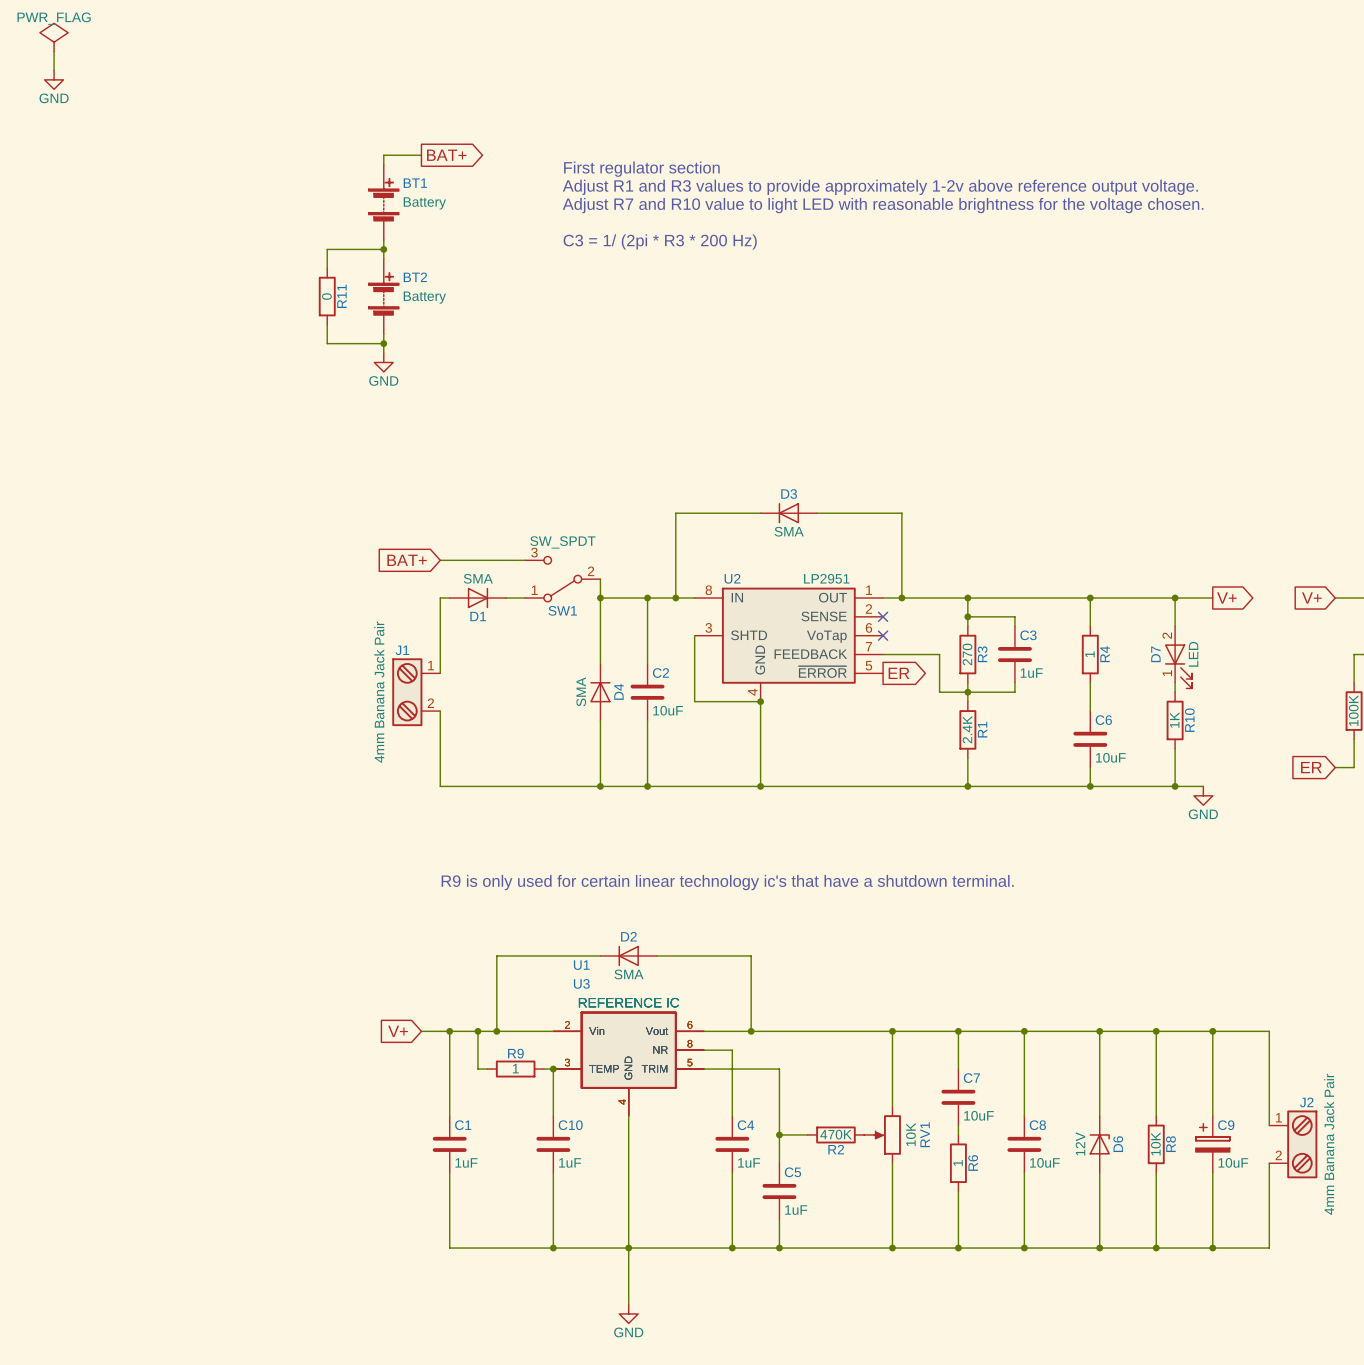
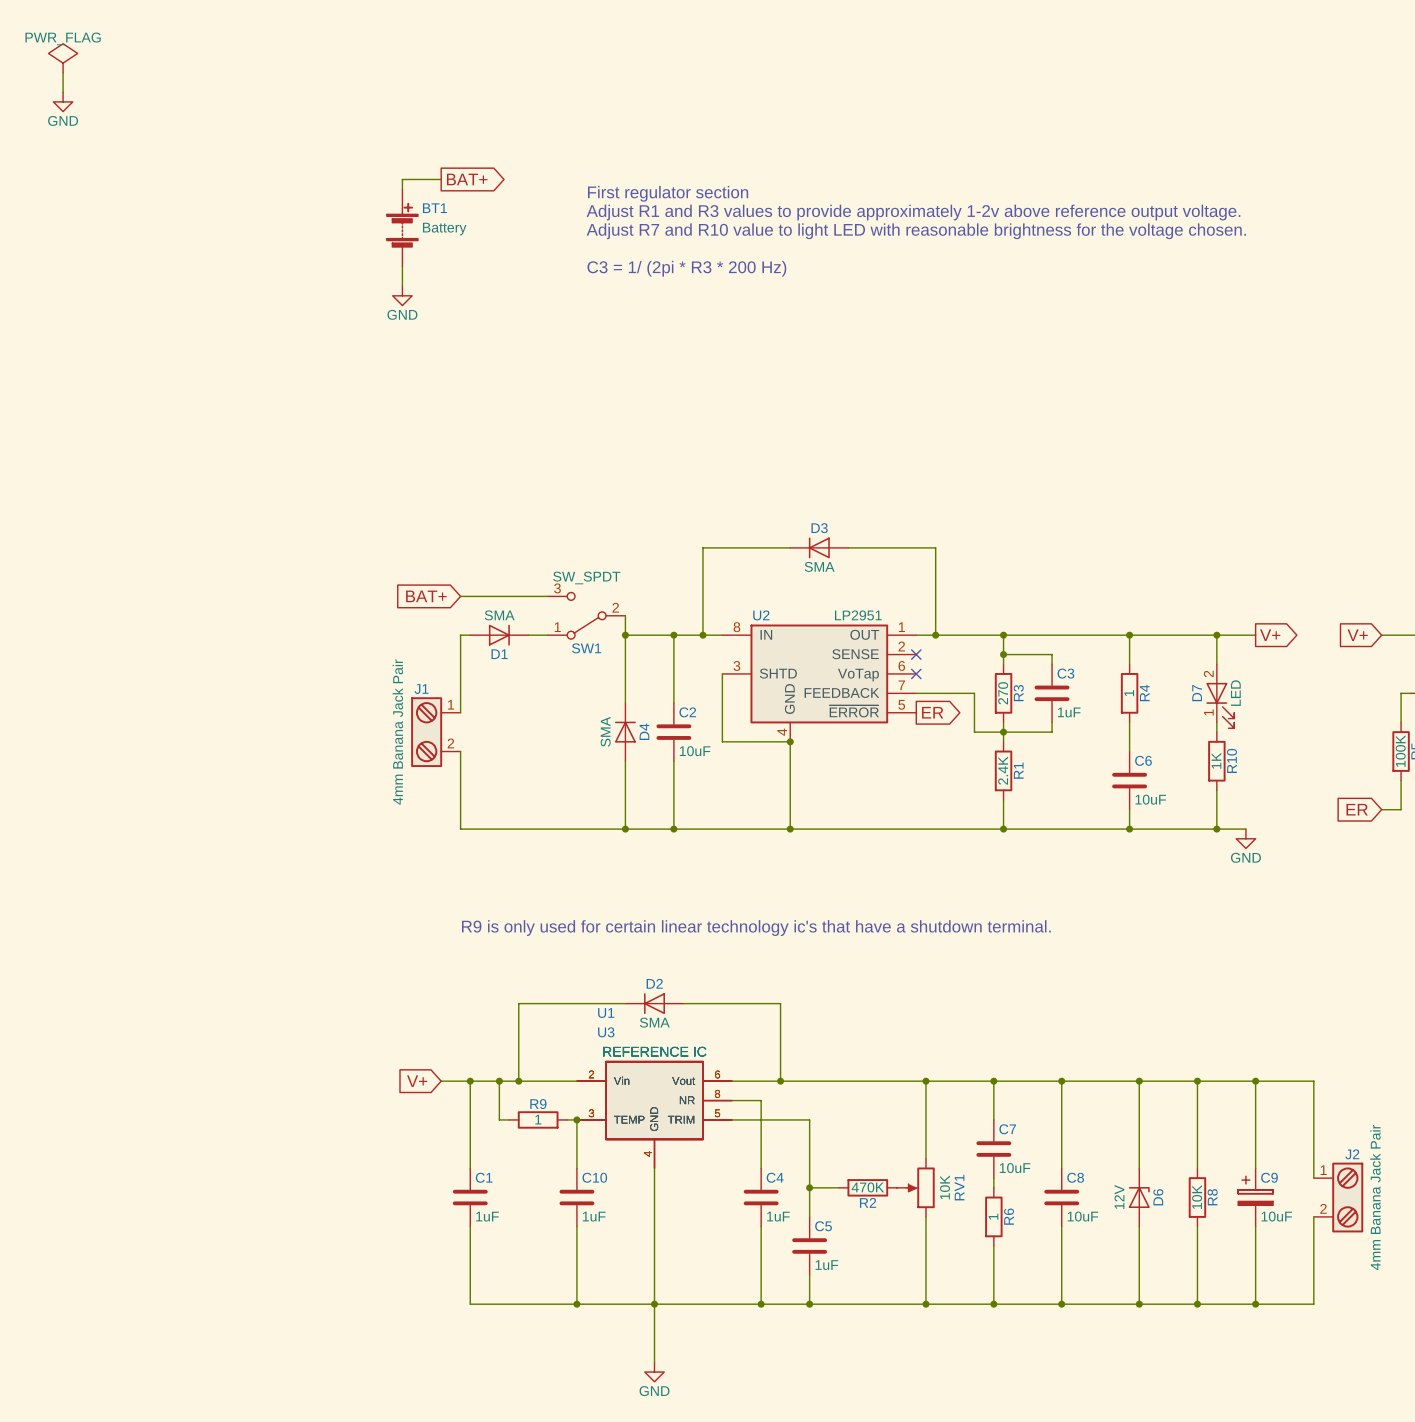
wire: (383, 249) (327, 249) (327, 268) -> none
junction: (383, 249) -> none
R11: 0 (327, 296) -> none
BT2: Battery (383, 296) -> none
wire: (327, 324) (327, 343) (383, 343) -> none
wire: (383, 334) (383, 353) -> none
junction: (383, 343) -> none
power symbol position: GND (383, 362) -> GND (402, 295)

